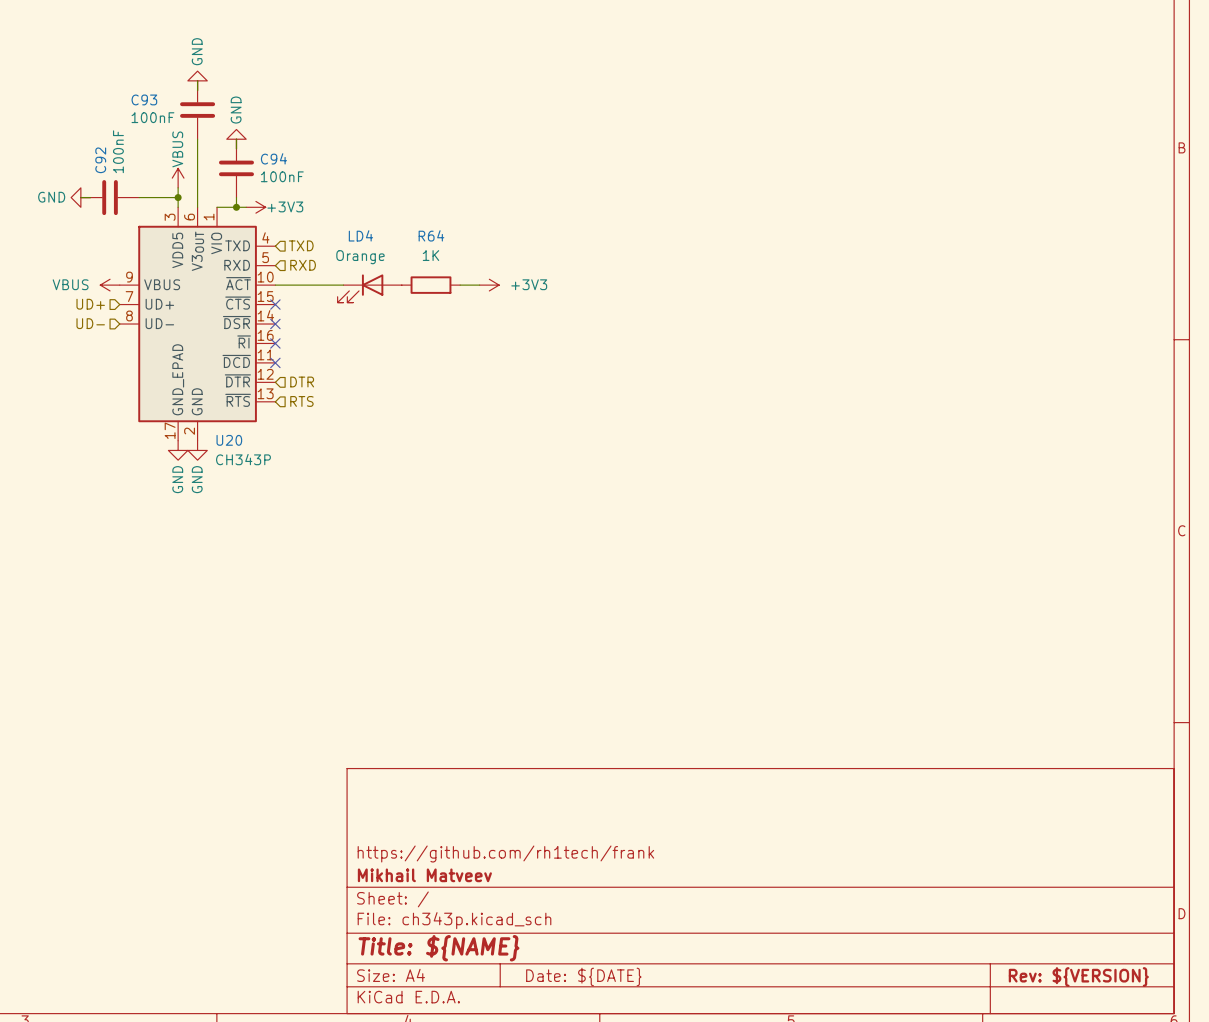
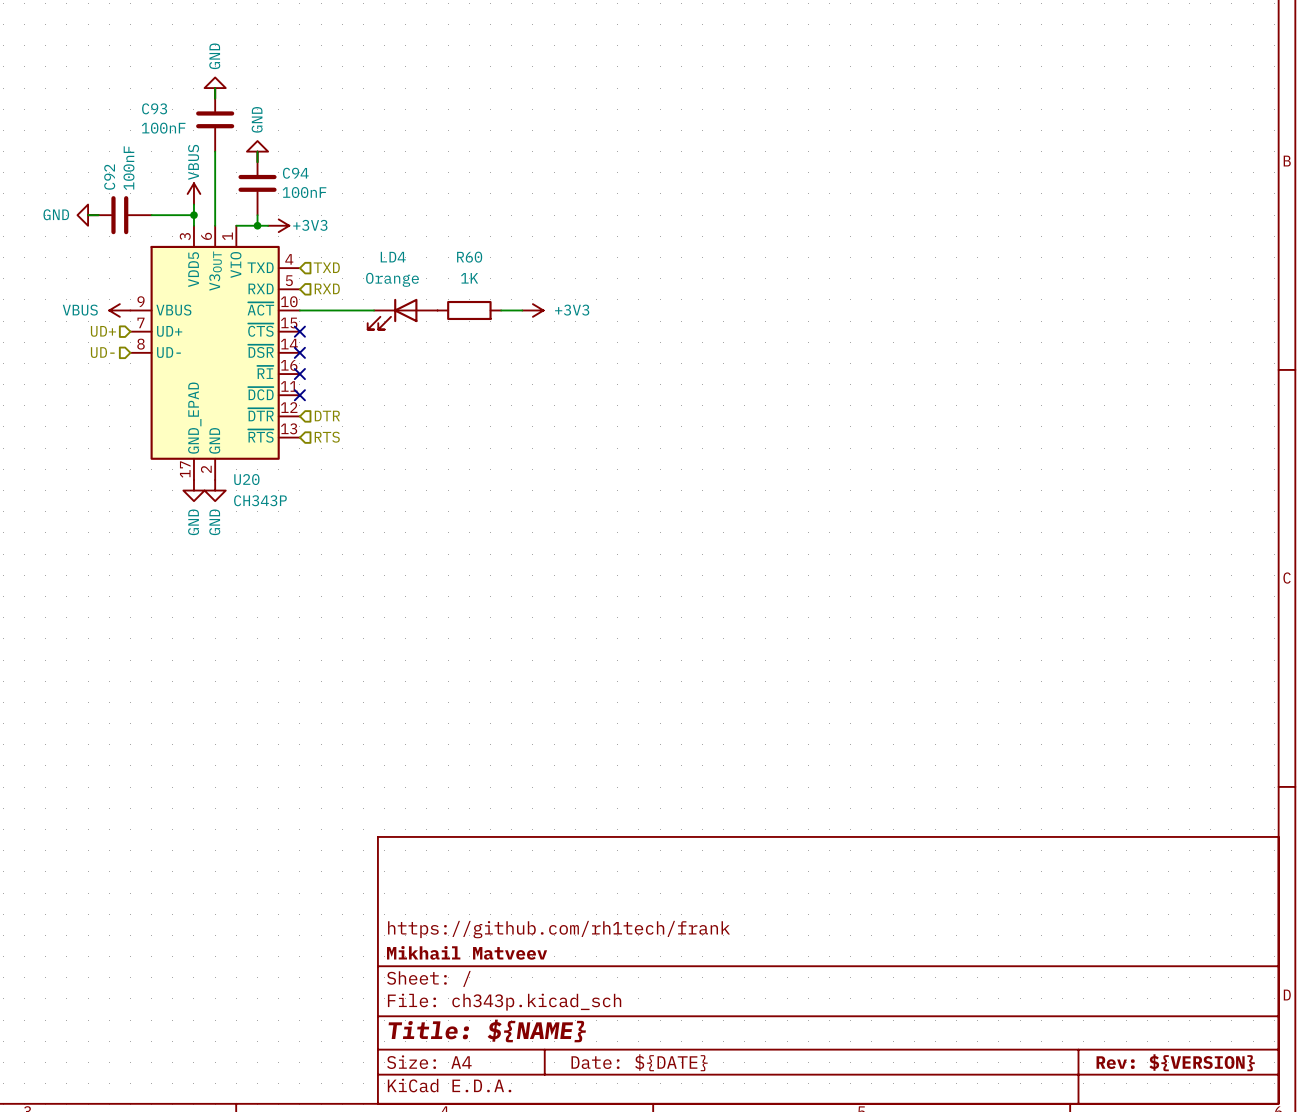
R64 name: R64 (431, 235) -> R60 (469, 257)

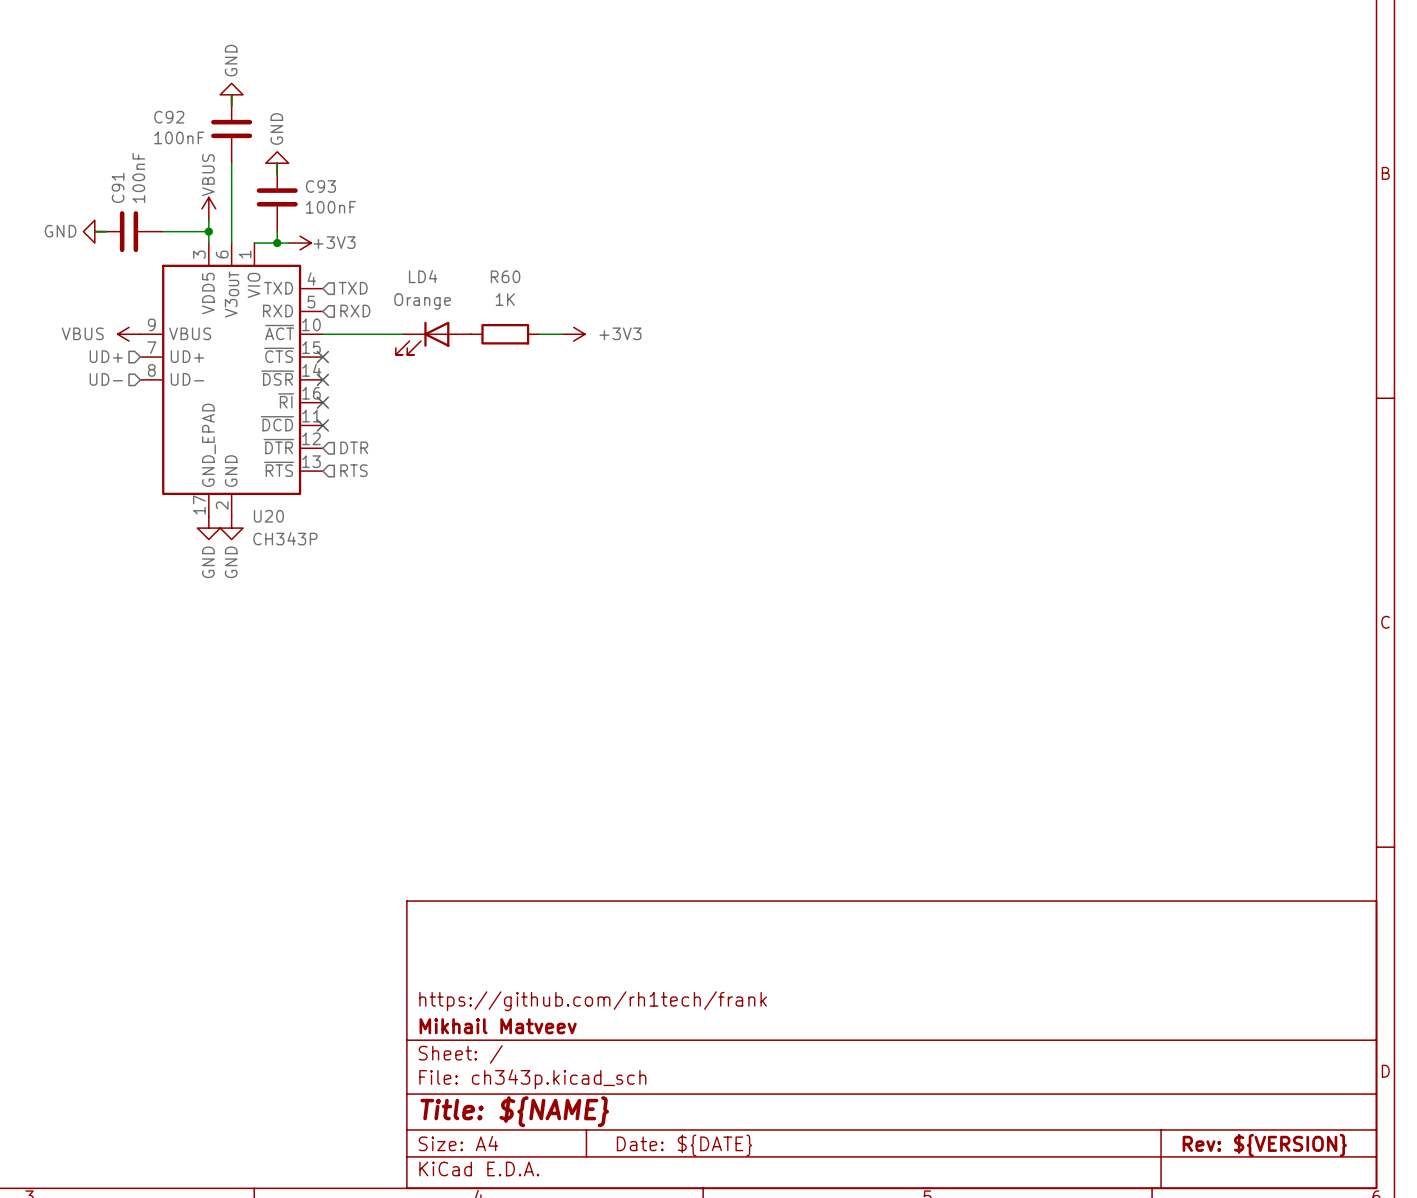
C93 name: C93 (154, 108) -> C92 (169, 117)
C94 name: C94 (295, 173) -> C93 (320, 186)
C92 name: C92 (109, 177) -> C91 (118, 187)

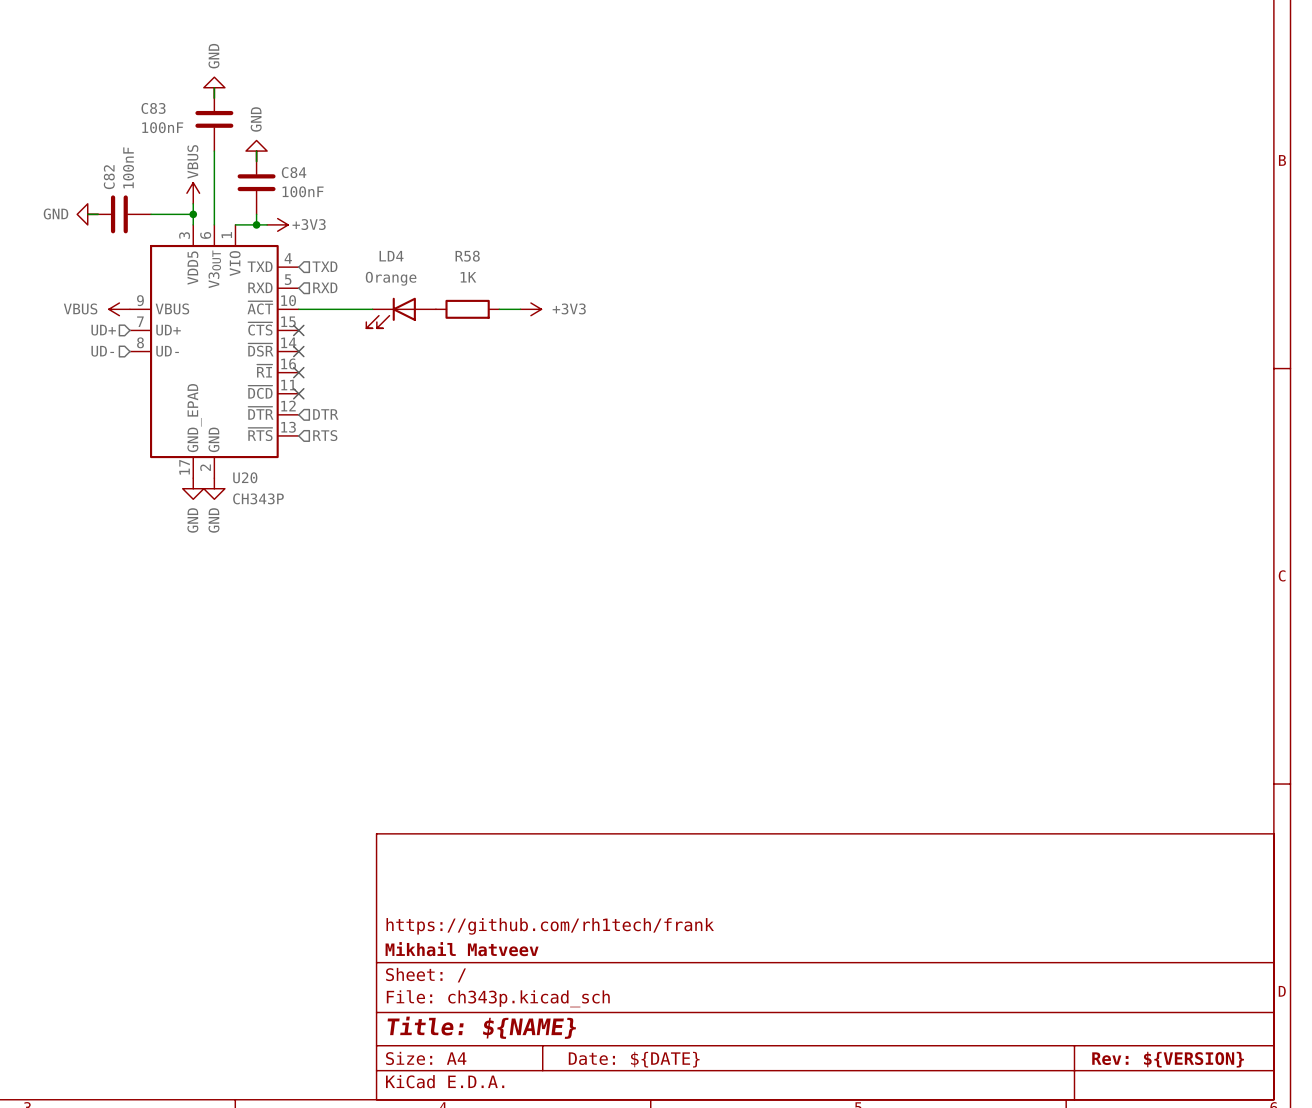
C92 name: C92 (169, 117) -> C83 (153, 108)
C93 name: C93 (320, 186) -> C84 (294, 172)
C91 name: C91 (118, 187) -> C82 (109, 177)
R60 name: R60 (505, 276) -> R58 (467, 256)

